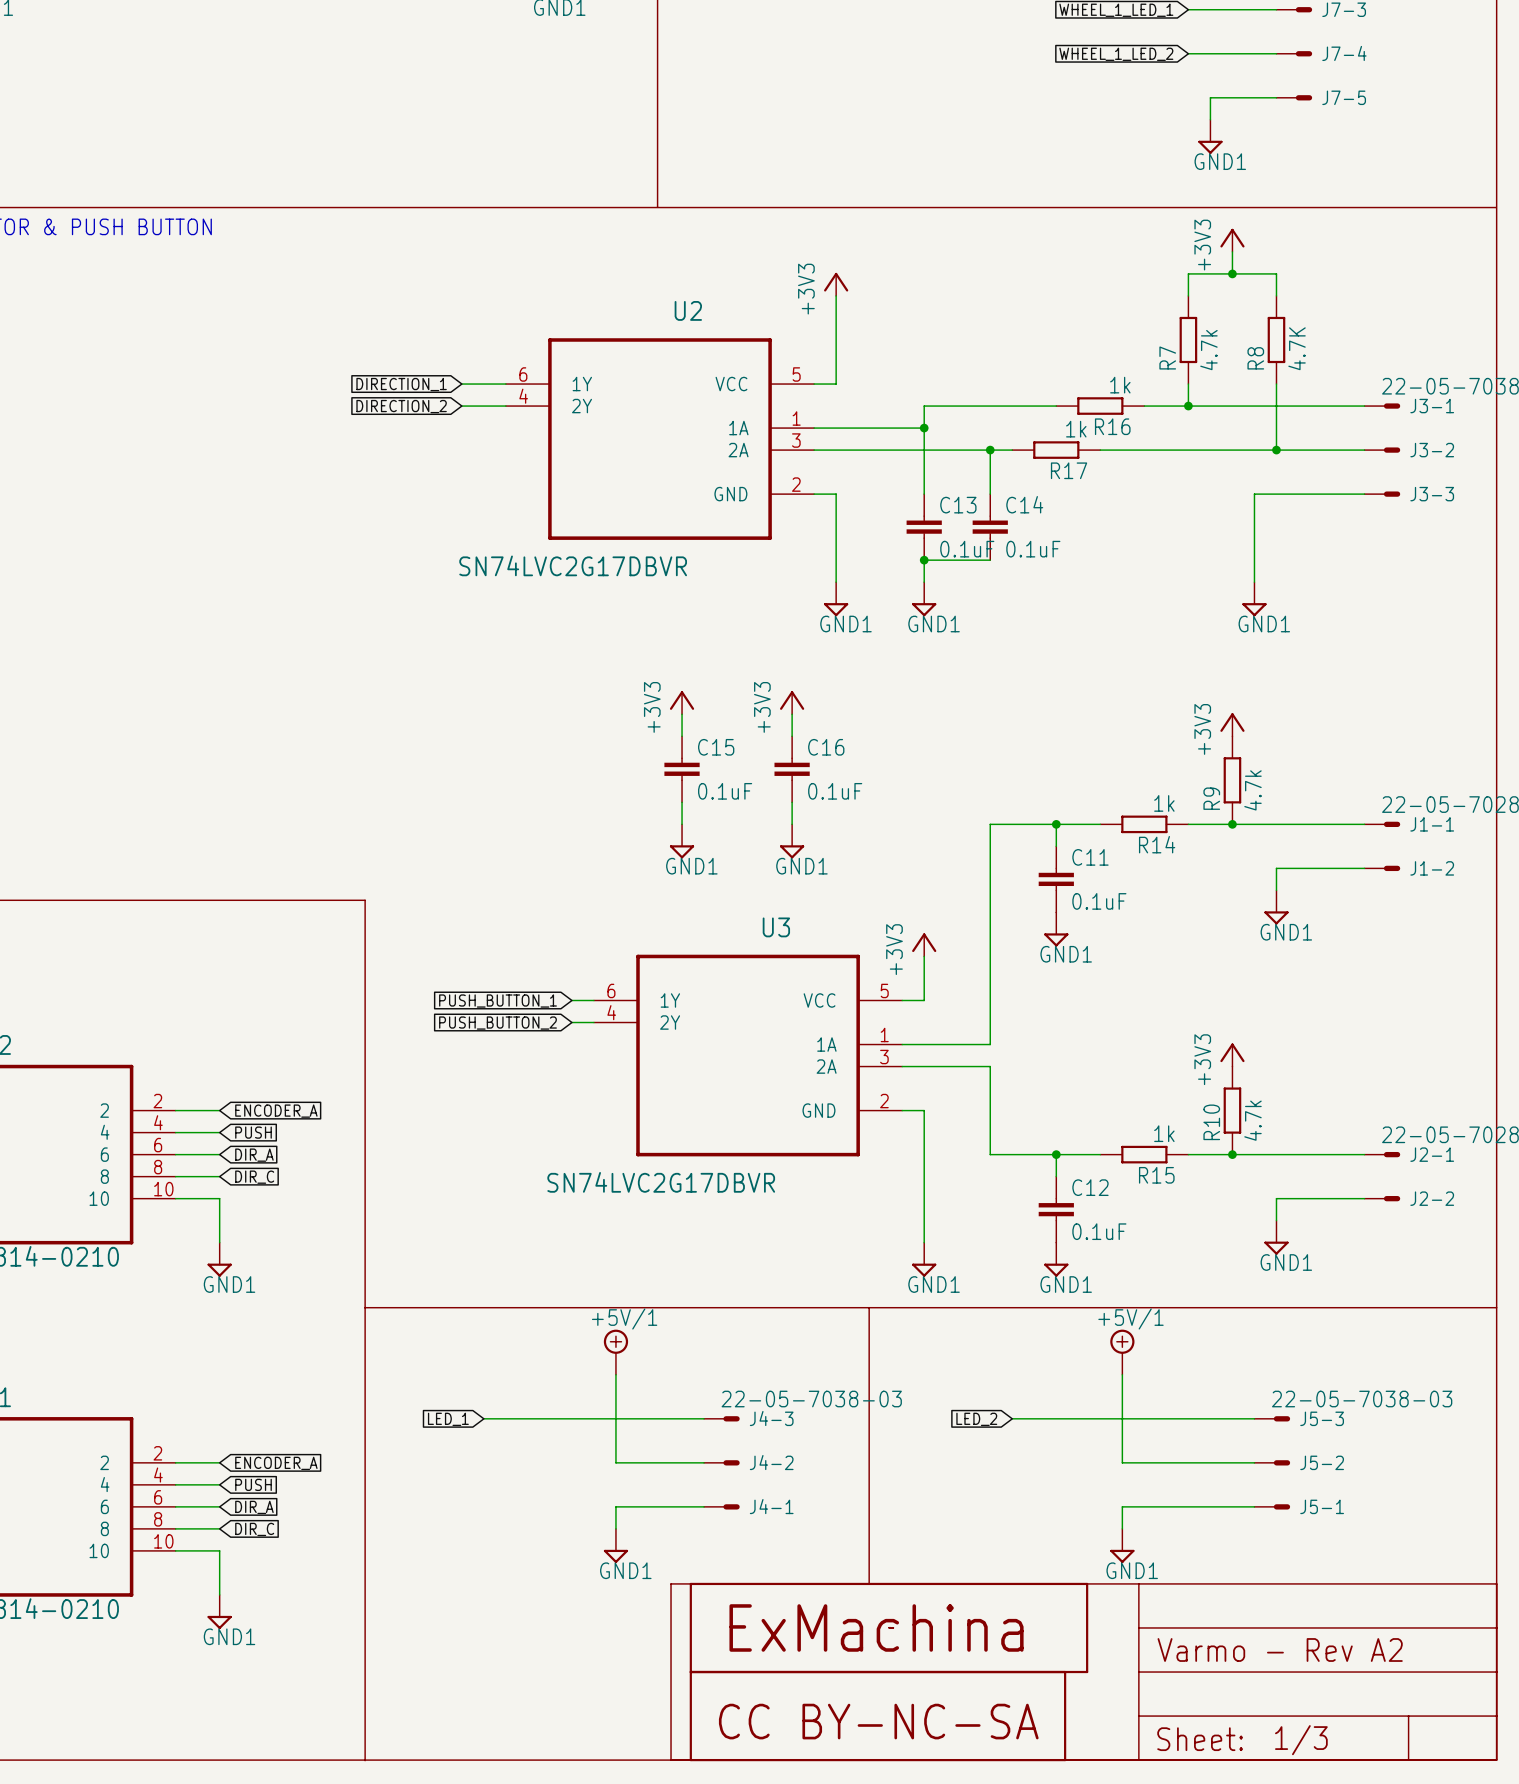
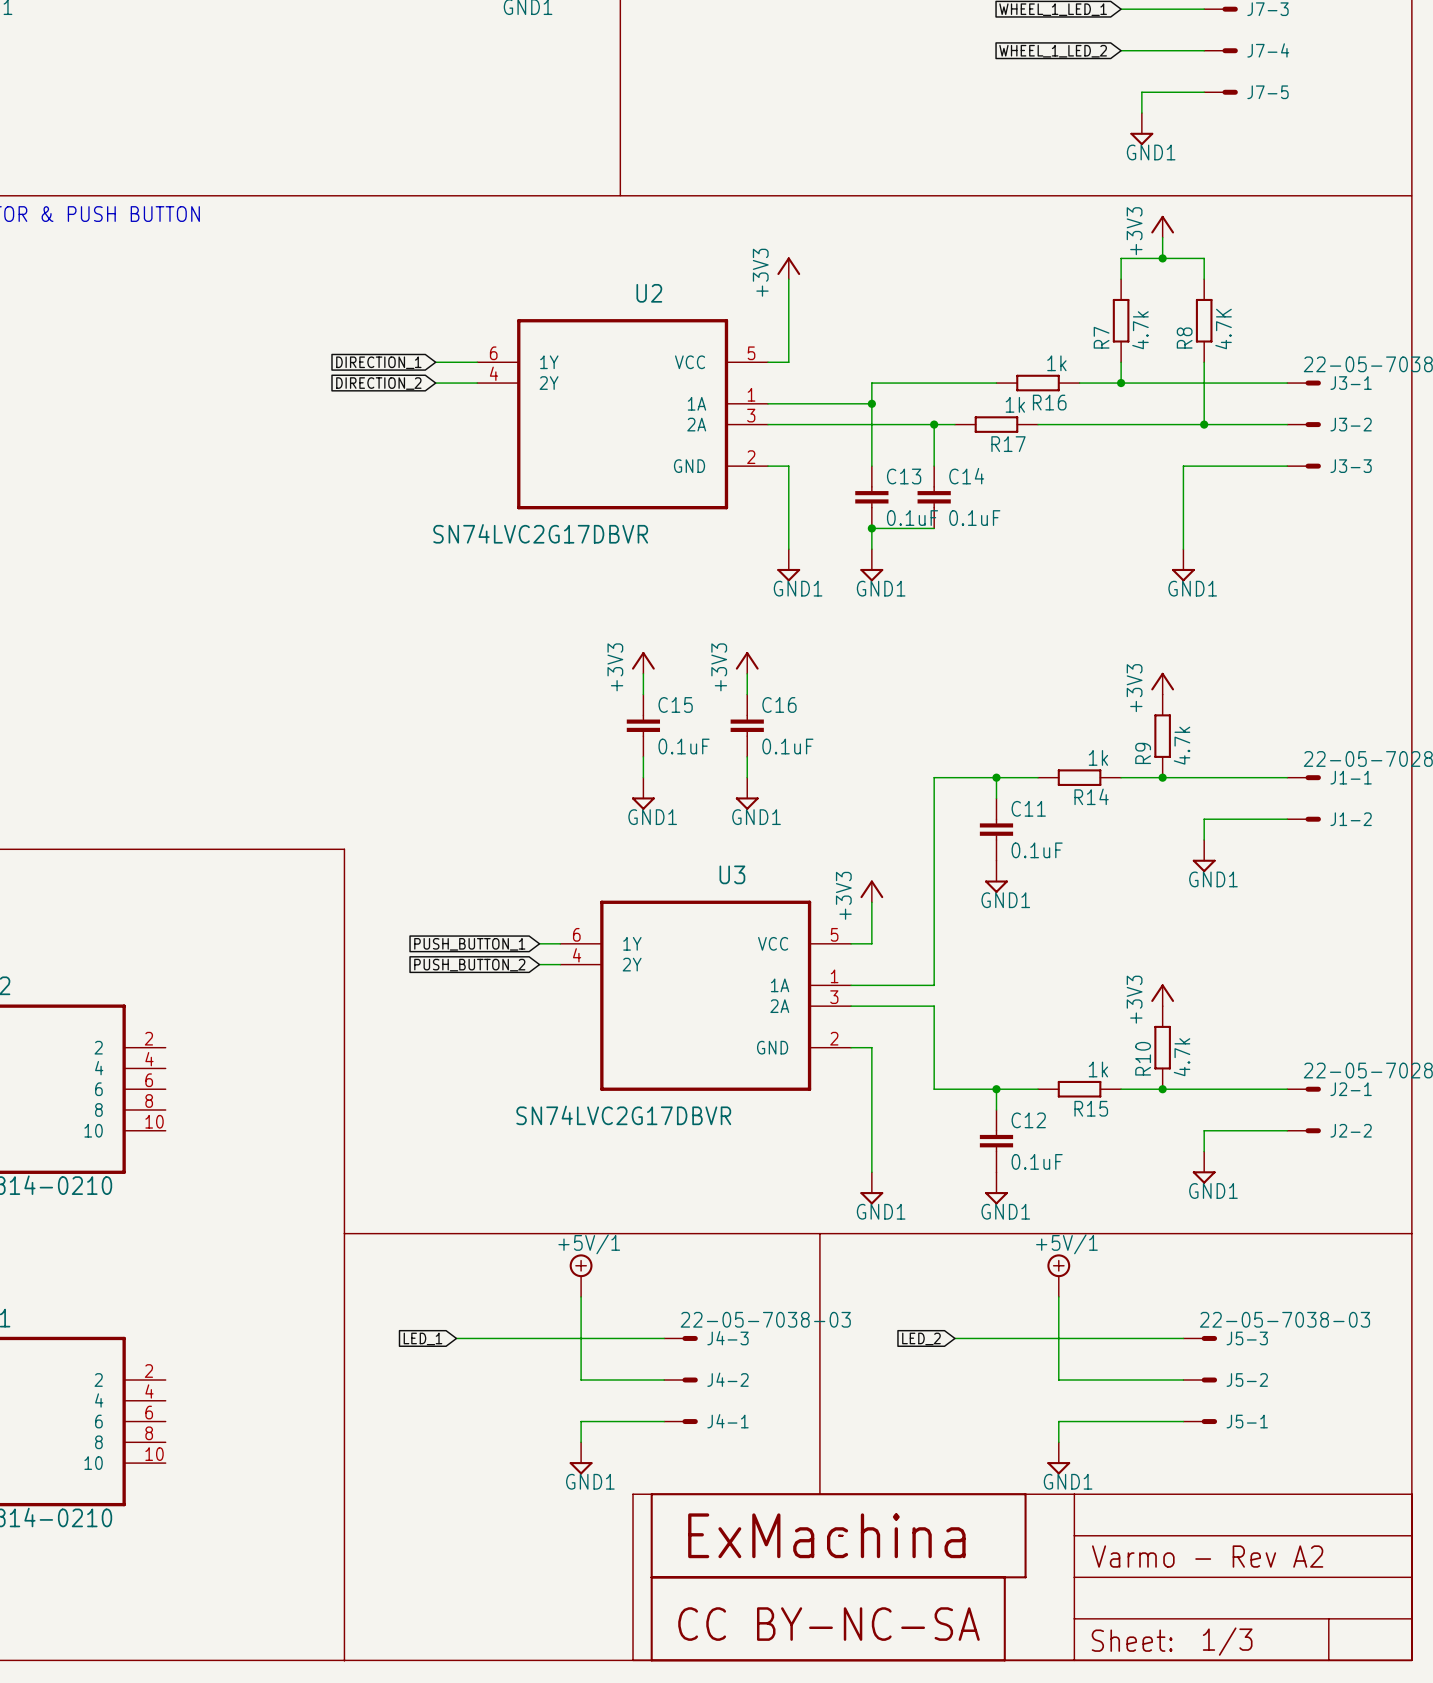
wire: (175, 1110) (219, 1110) -> none
global label: ENCODER_A (276, 1111) -> none
wire: (175, 1132) (219, 1132) -> none
global label: PUSH (253, 1132) -> none
wire: (175, 1154) (219, 1154) -> none
global label: DIR_A (254, 1155) -> none
wire: (175, 1176) (219, 1176) -> none
global label: DIR_C (254, 1177) -> none
wire: (175, 1198) (219, 1198) (219, 1242) -> none
power symbol: GND1 (219, 1259) -> none
wire: (175, 1462) (219, 1462) -> none
global label: ENCODER_A (276, 1463) -> none
wire: (175, 1484) (219, 1484) -> none
global label: PUSH (253, 1484) -> none
wire: (175, 1506) (219, 1506) -> none
global label: DIR_A (254, 1507) -> none
wire: (175, 1528) (219, 1528) -> none
global label: DIR_C (254, 1529) -> none
wire: (175, 1550) (219, 1550) (219, 1594) -> none
power symbol: GND1 (219, 1612) -> none

